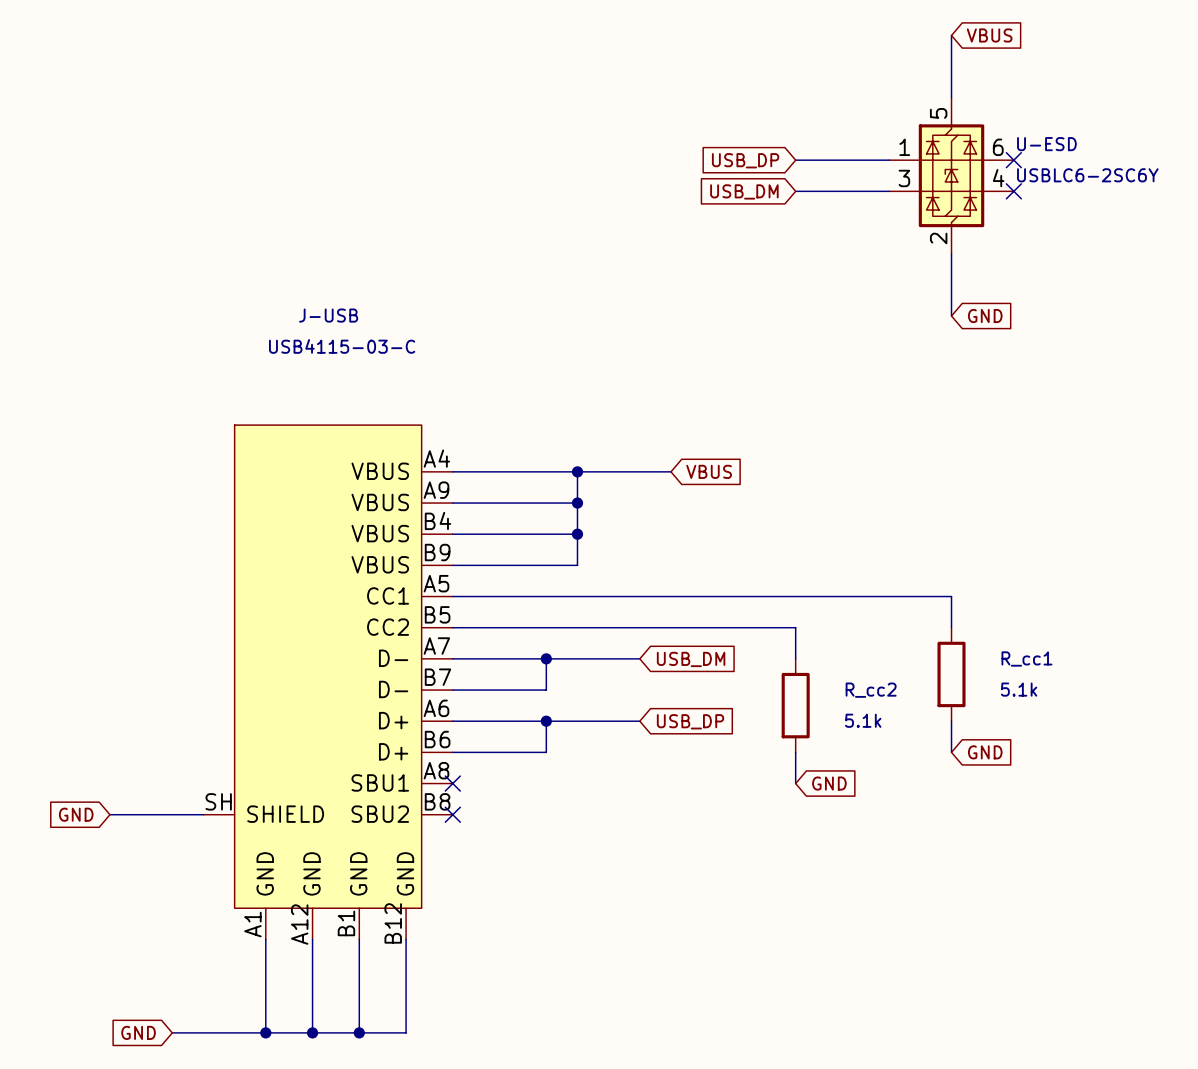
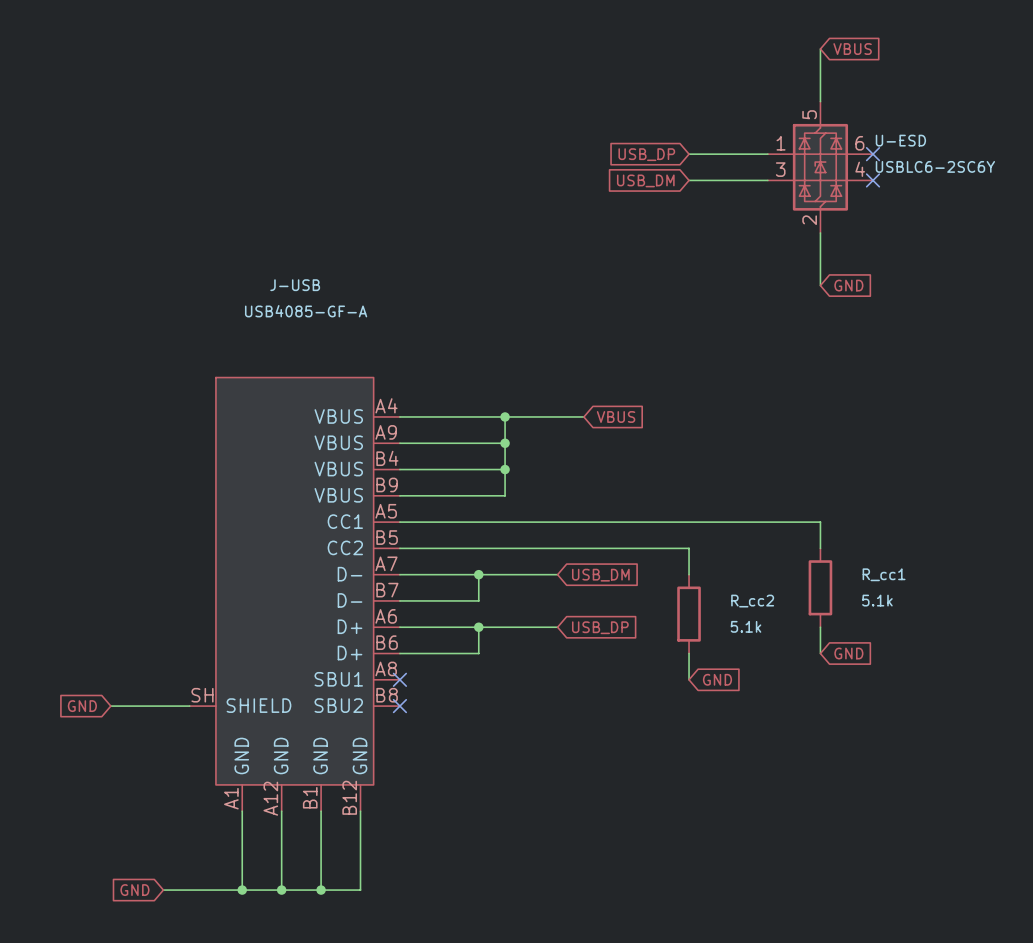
J-USB value: USB4115-03-C (342, 346) -> USB4085-GF-A (306, 311)

